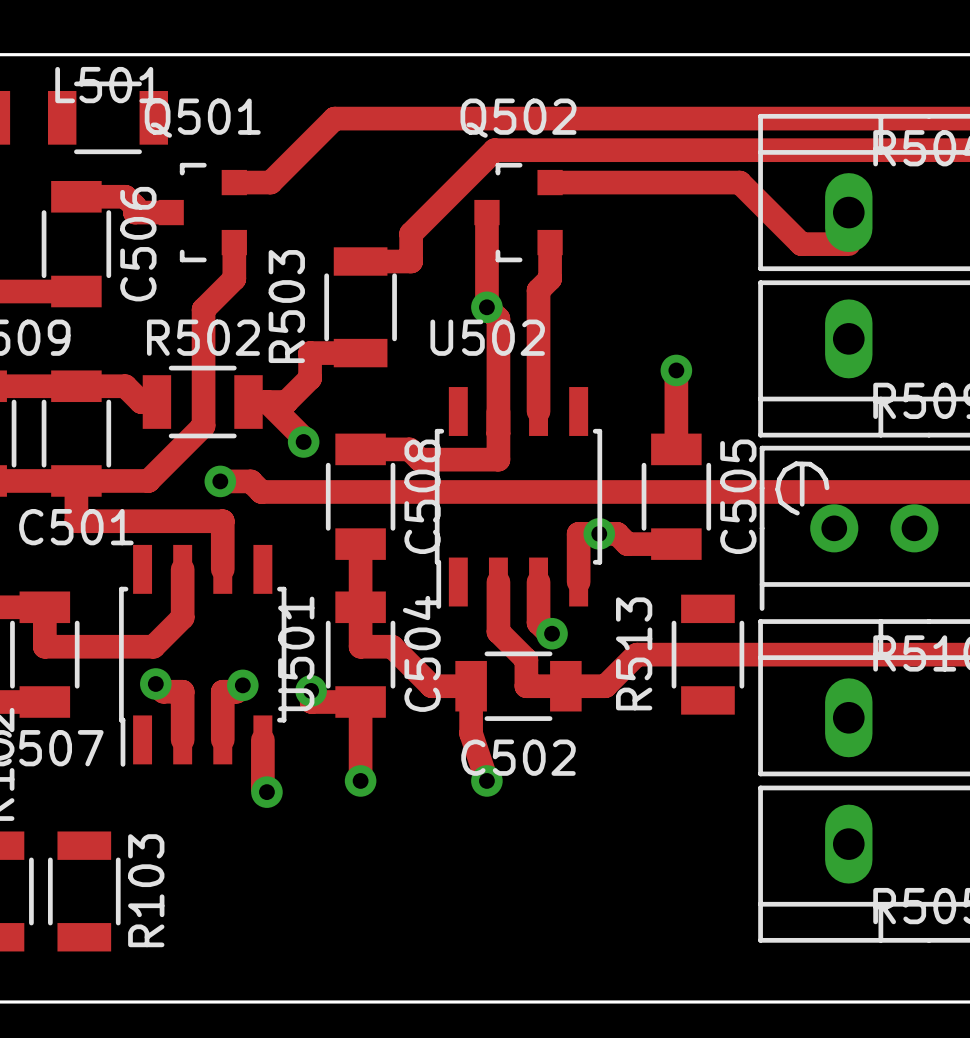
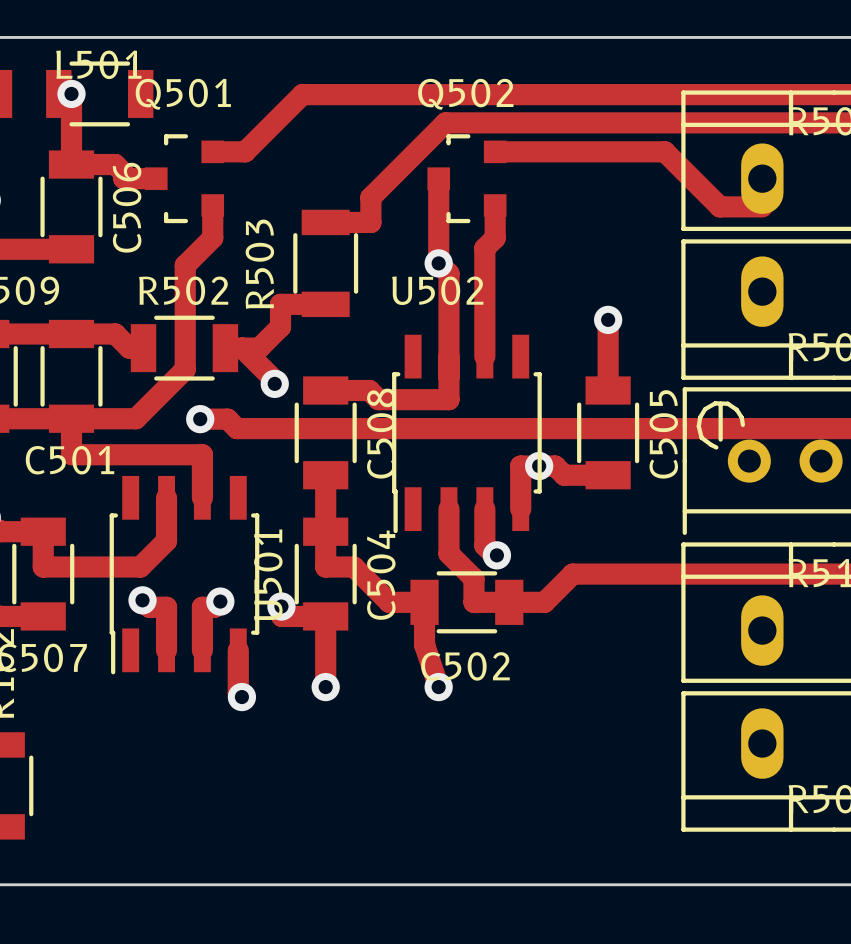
track: none -> (71, 93) (71, 164)
via: none -> (71, 93)
R513: (707, 654) -> none
R103: (84, 891) -> none

